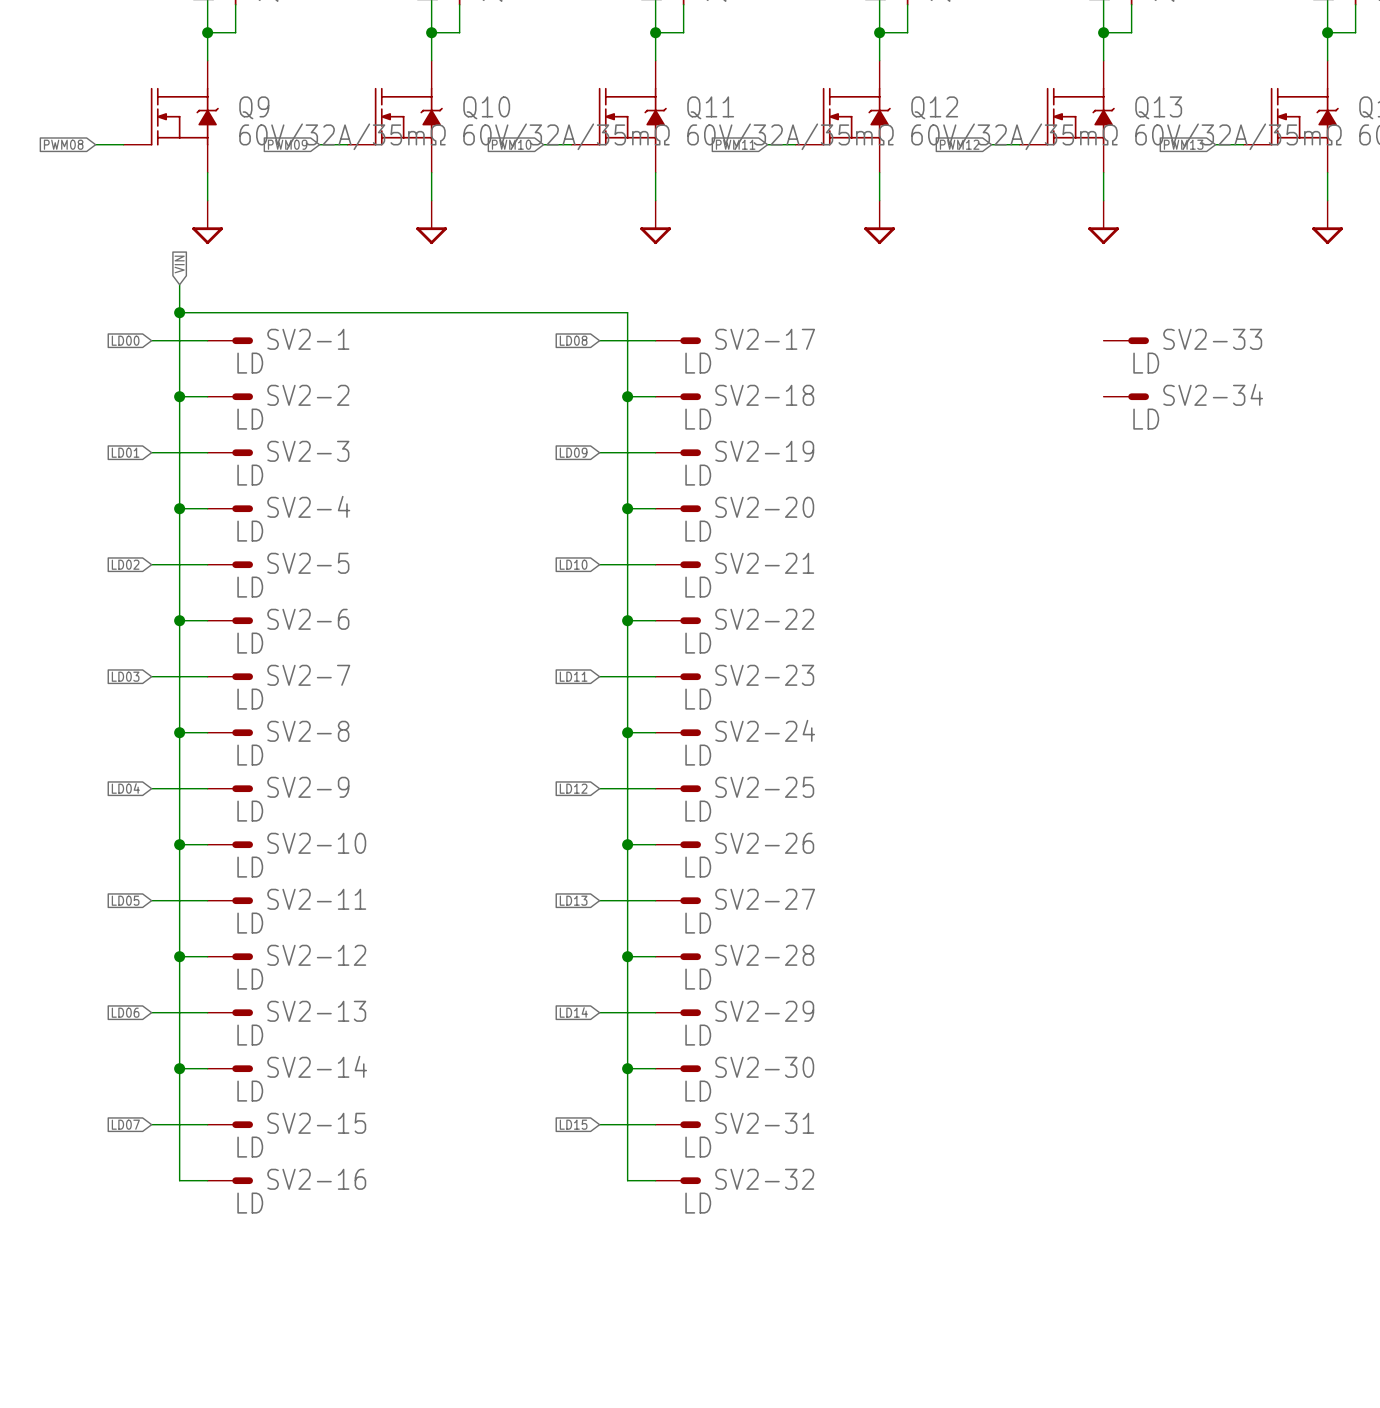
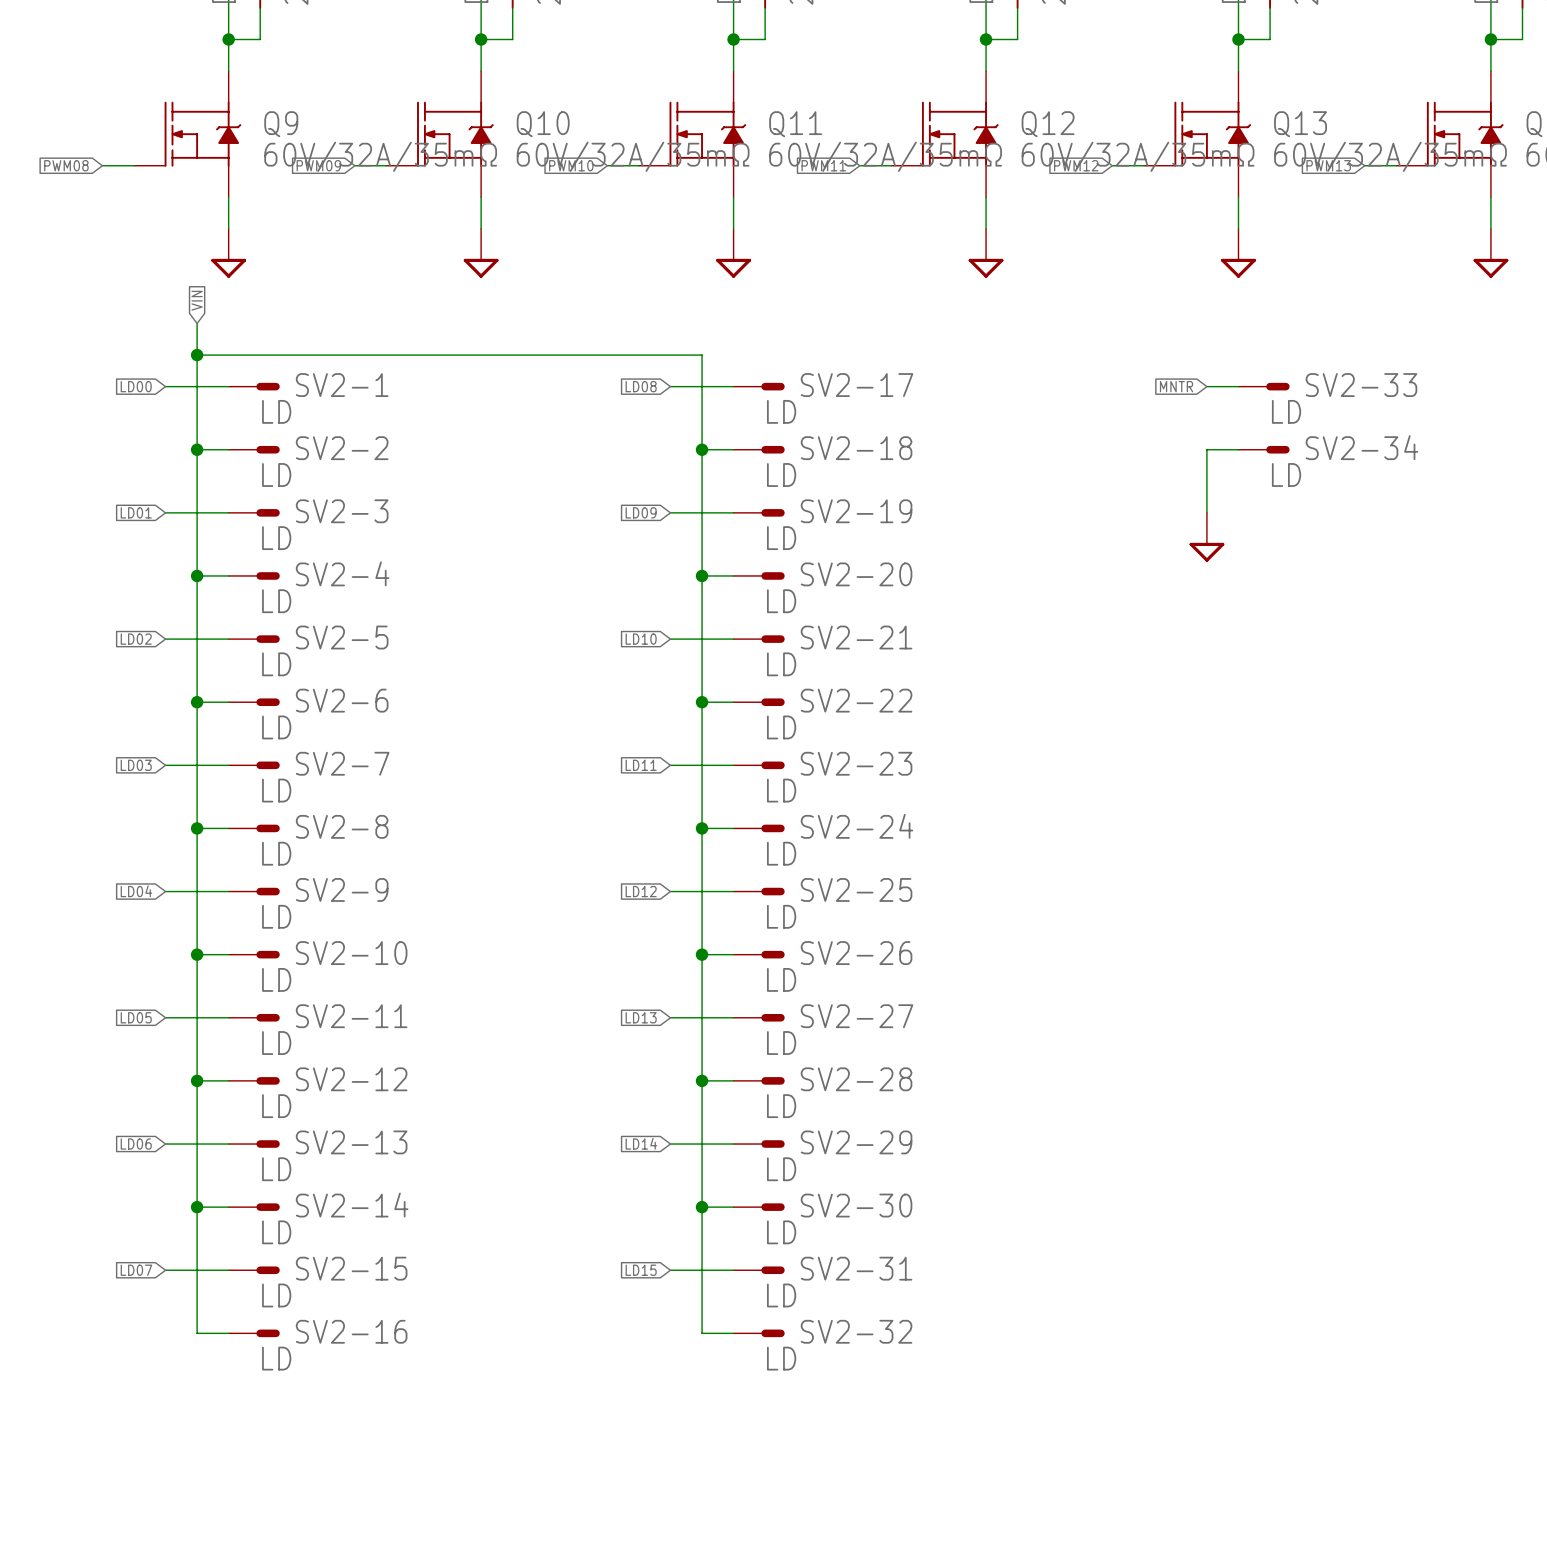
global label: none -> MNTR (1176, 386)
wire: none -> (1206, 386) (1238, 386)
wire: none -> (1238, 449) (1206, 449) (1206, 512)
power symbol: none -> (1206, 537)

